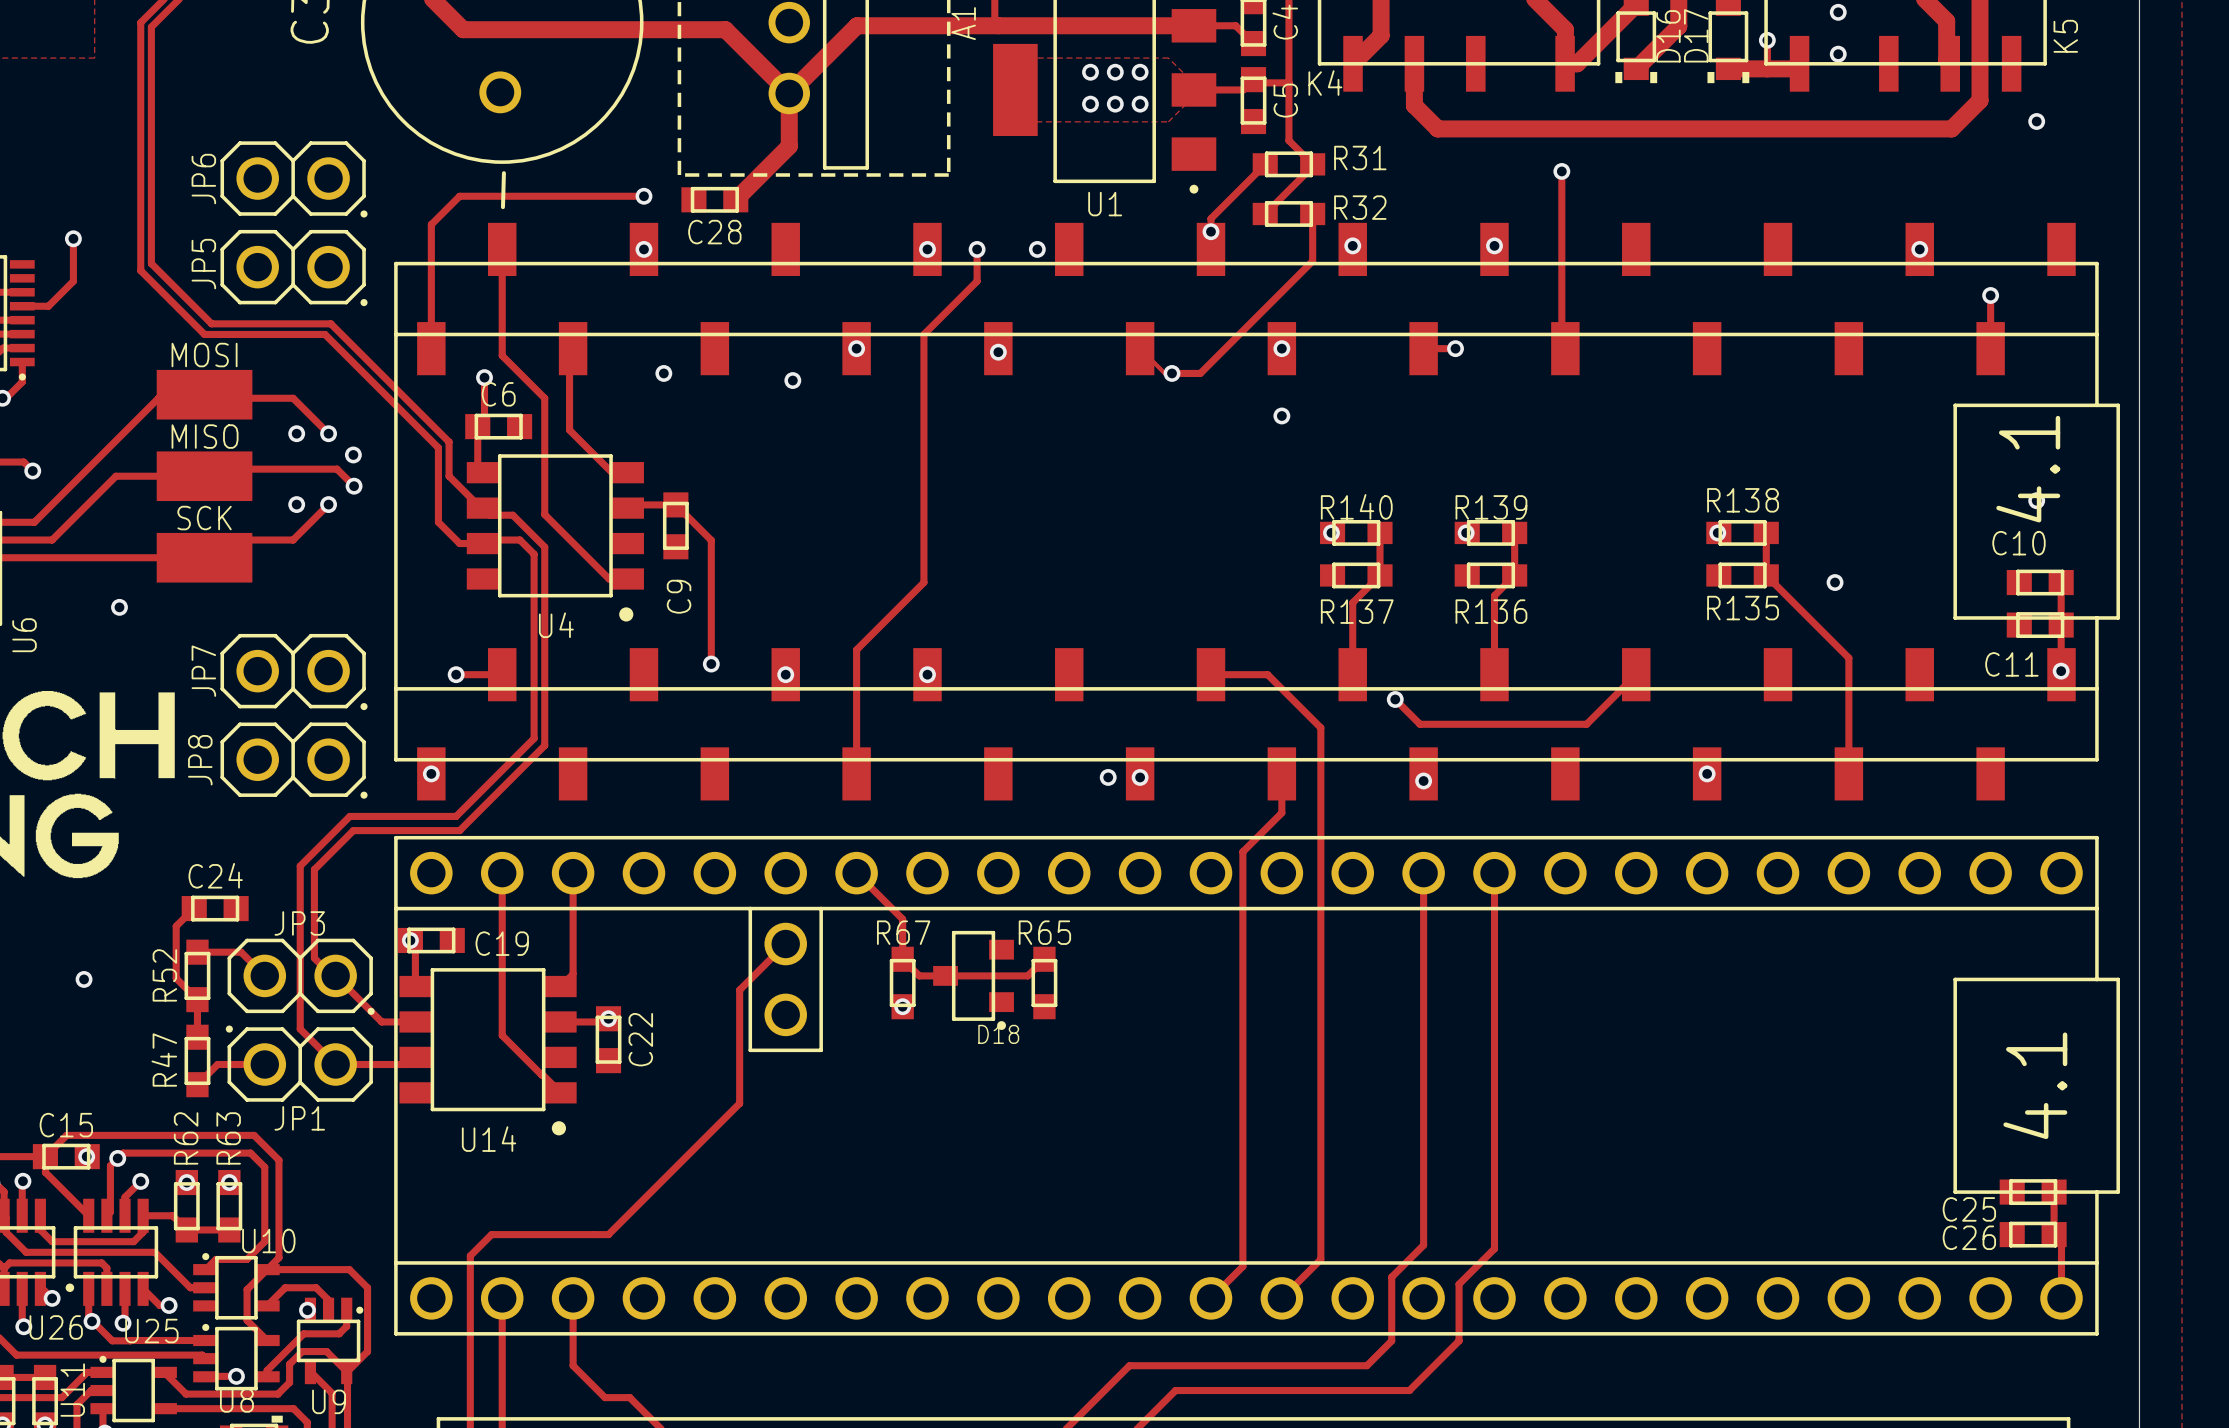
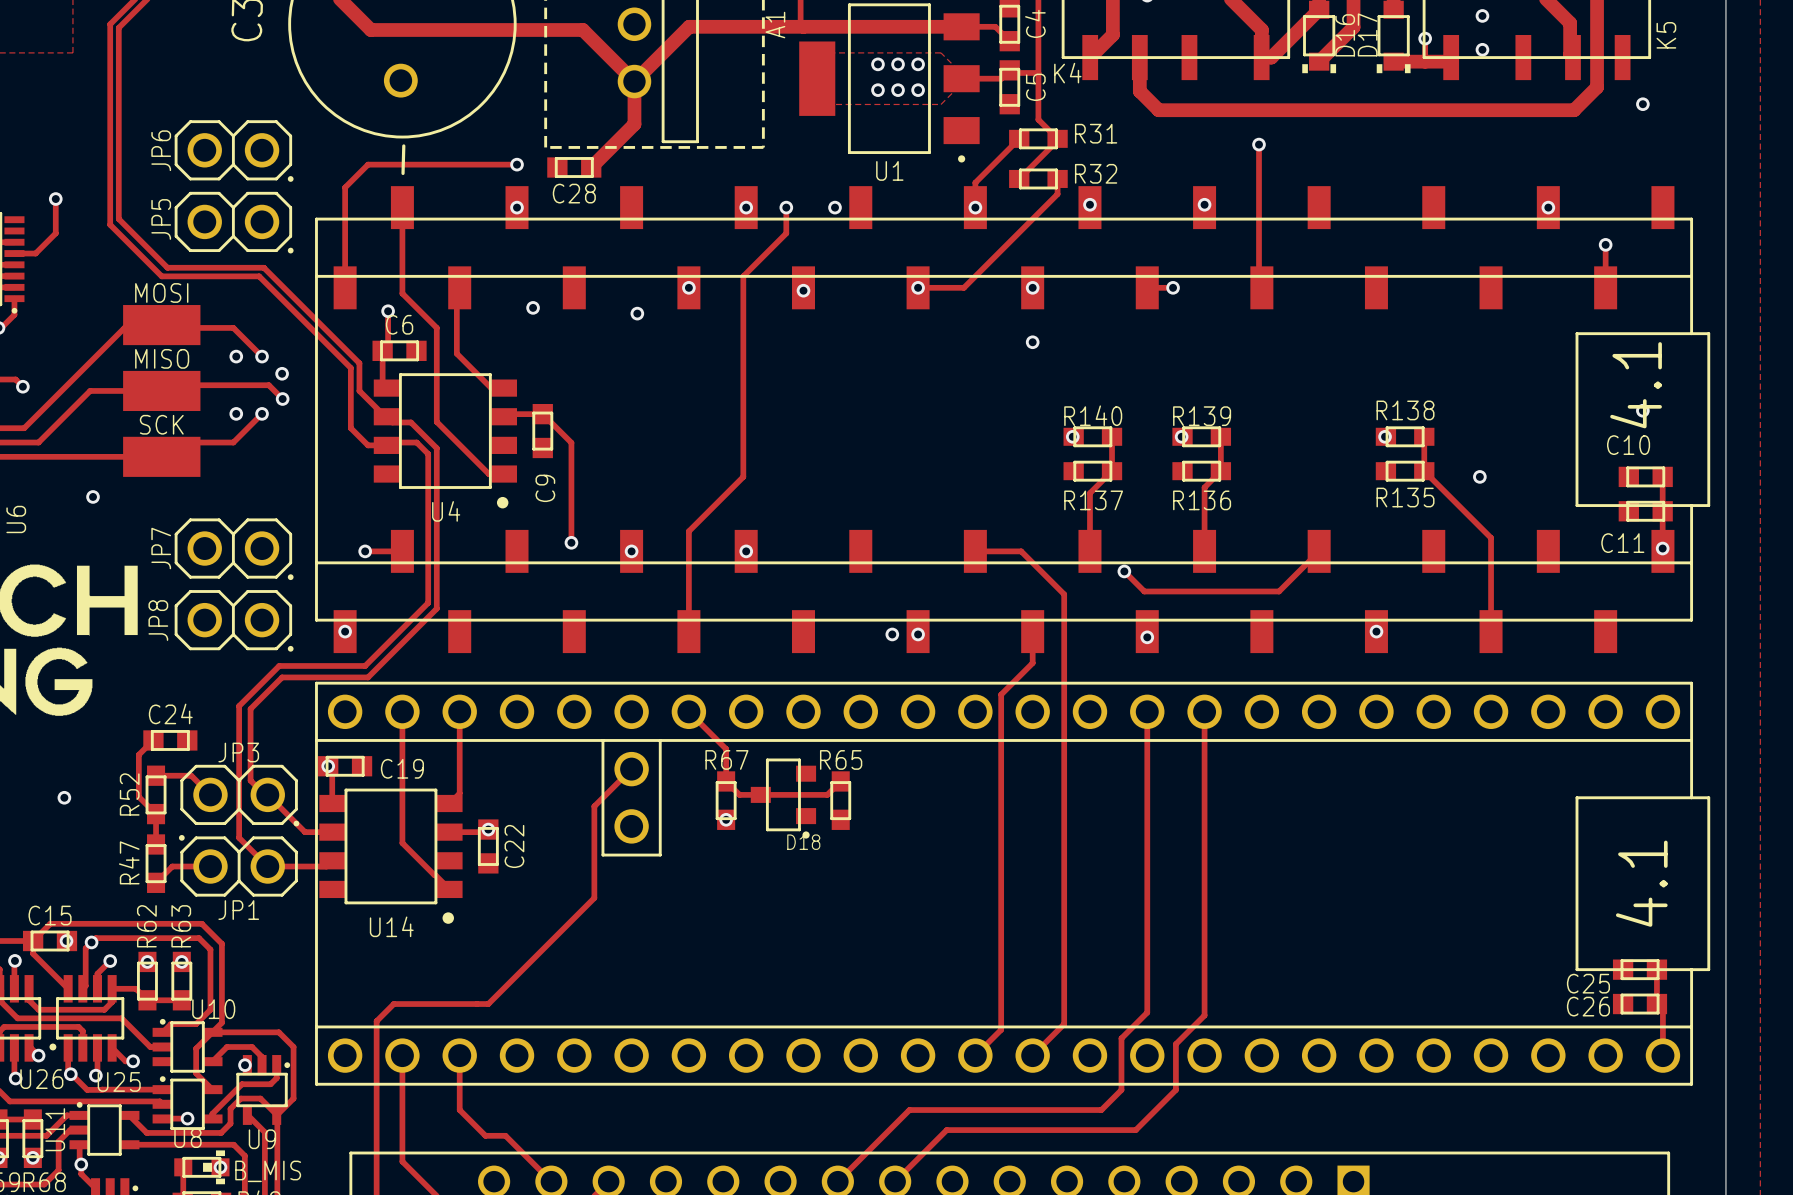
via position: (1210, 231) -> (975, 207)
track: (1312, 232) (1312, 261) (1200, 373) (1164, 373) (1140, 348) -> (1057, 194) (963, 287) (918, 287)
via position: (1172, 373) -> (918, 287)

